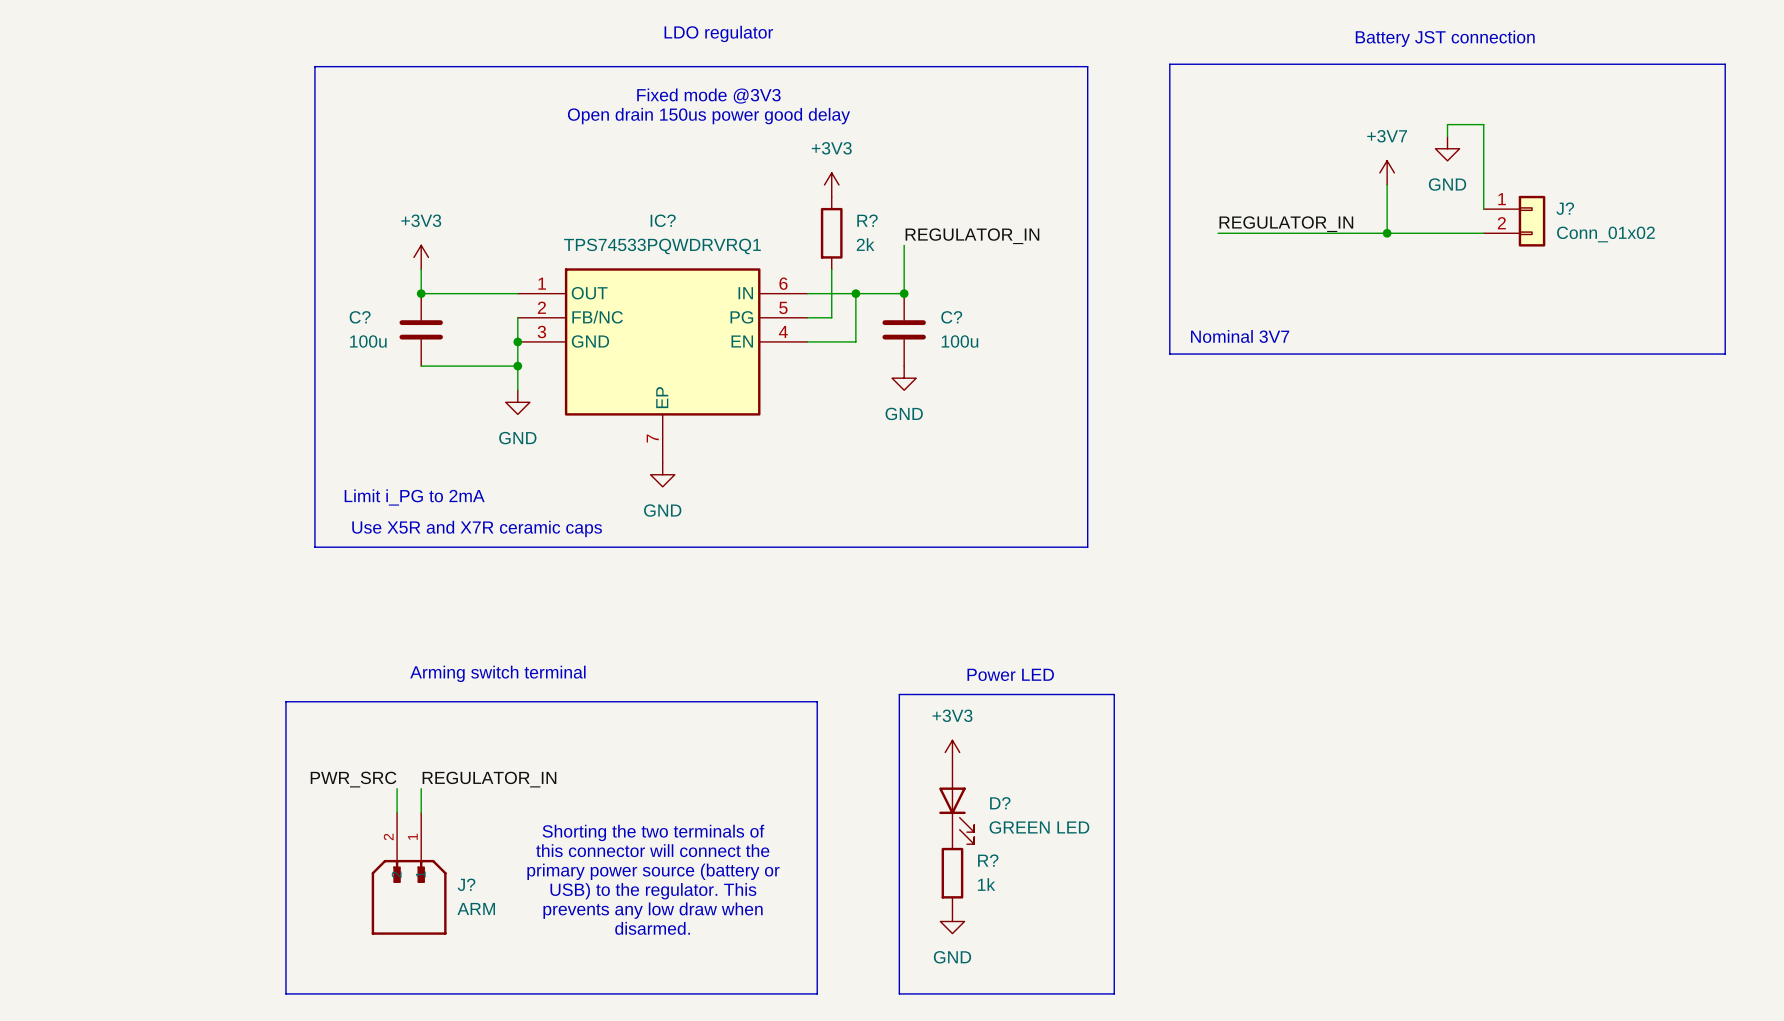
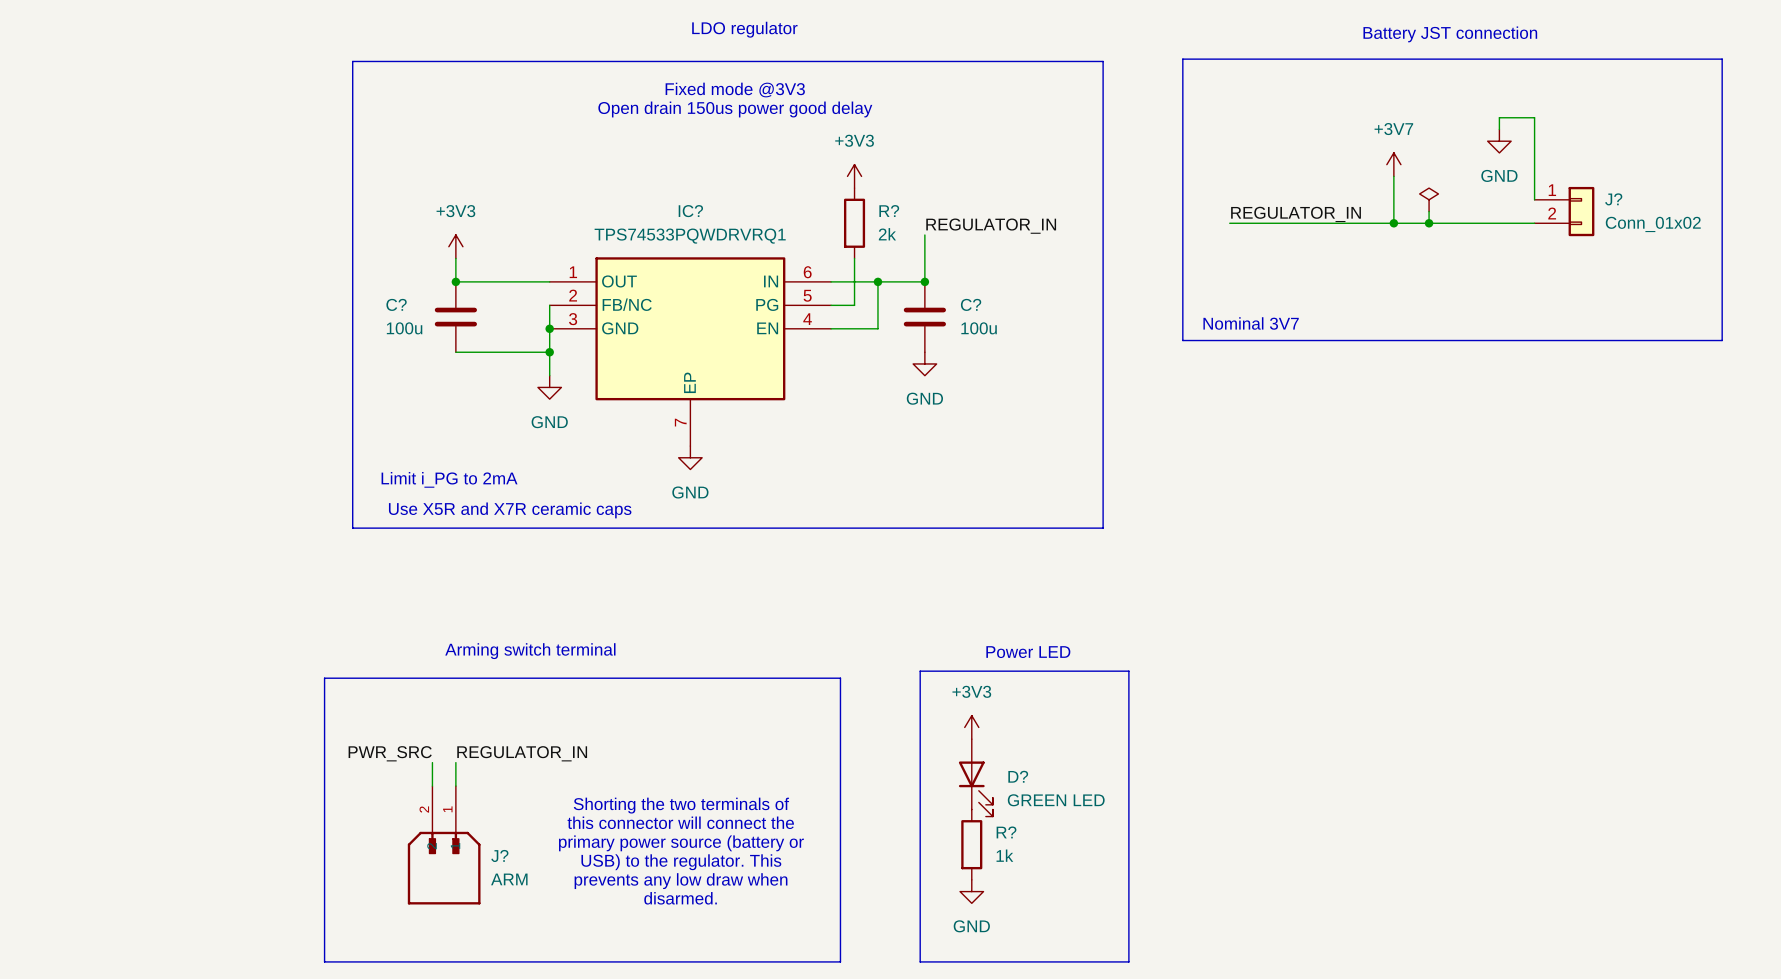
wire: (1447, 136) (1447, 124) (1483, 124) (1483, 209) -> (1499, 129) (1499, 117) (1534, 117) (1534, 199)
power symbol position: GND (1447, 148) -> GND (1499, 141)
power symbol: none -> (1429, 199)
wire: none -> (1429, 211) (1429, 223)
J? position: (1514, 221) -> (1564, 211)
junction: none -> (1429, 223)

